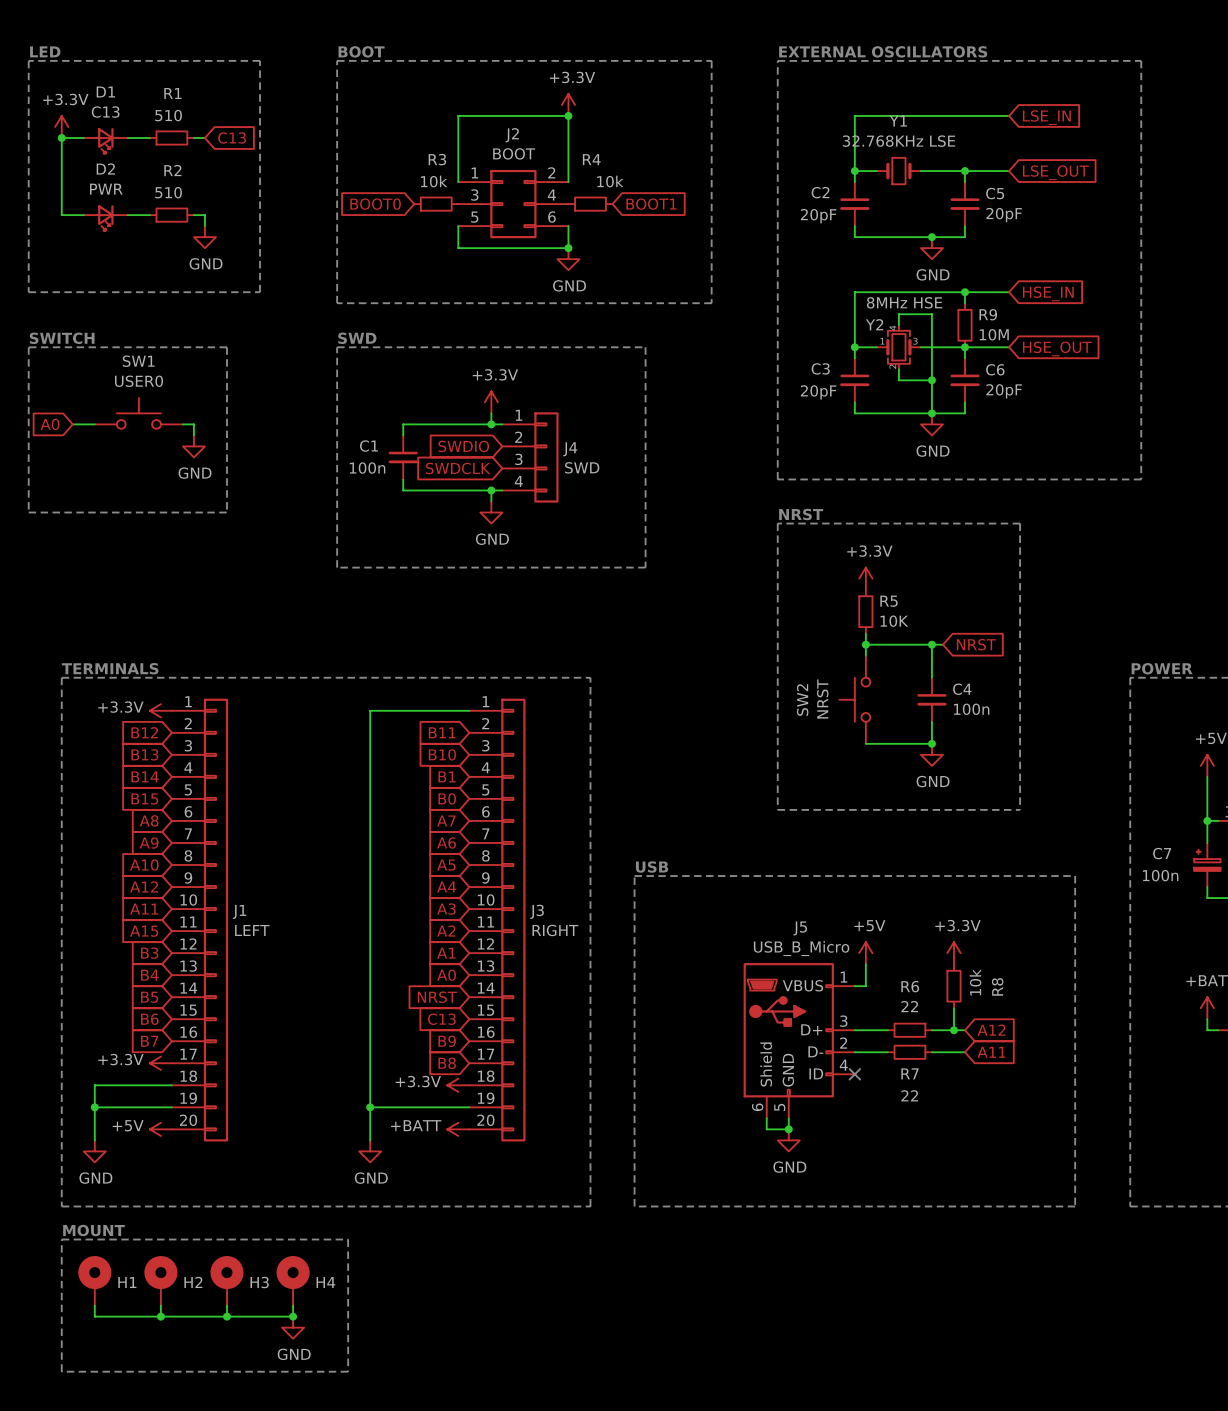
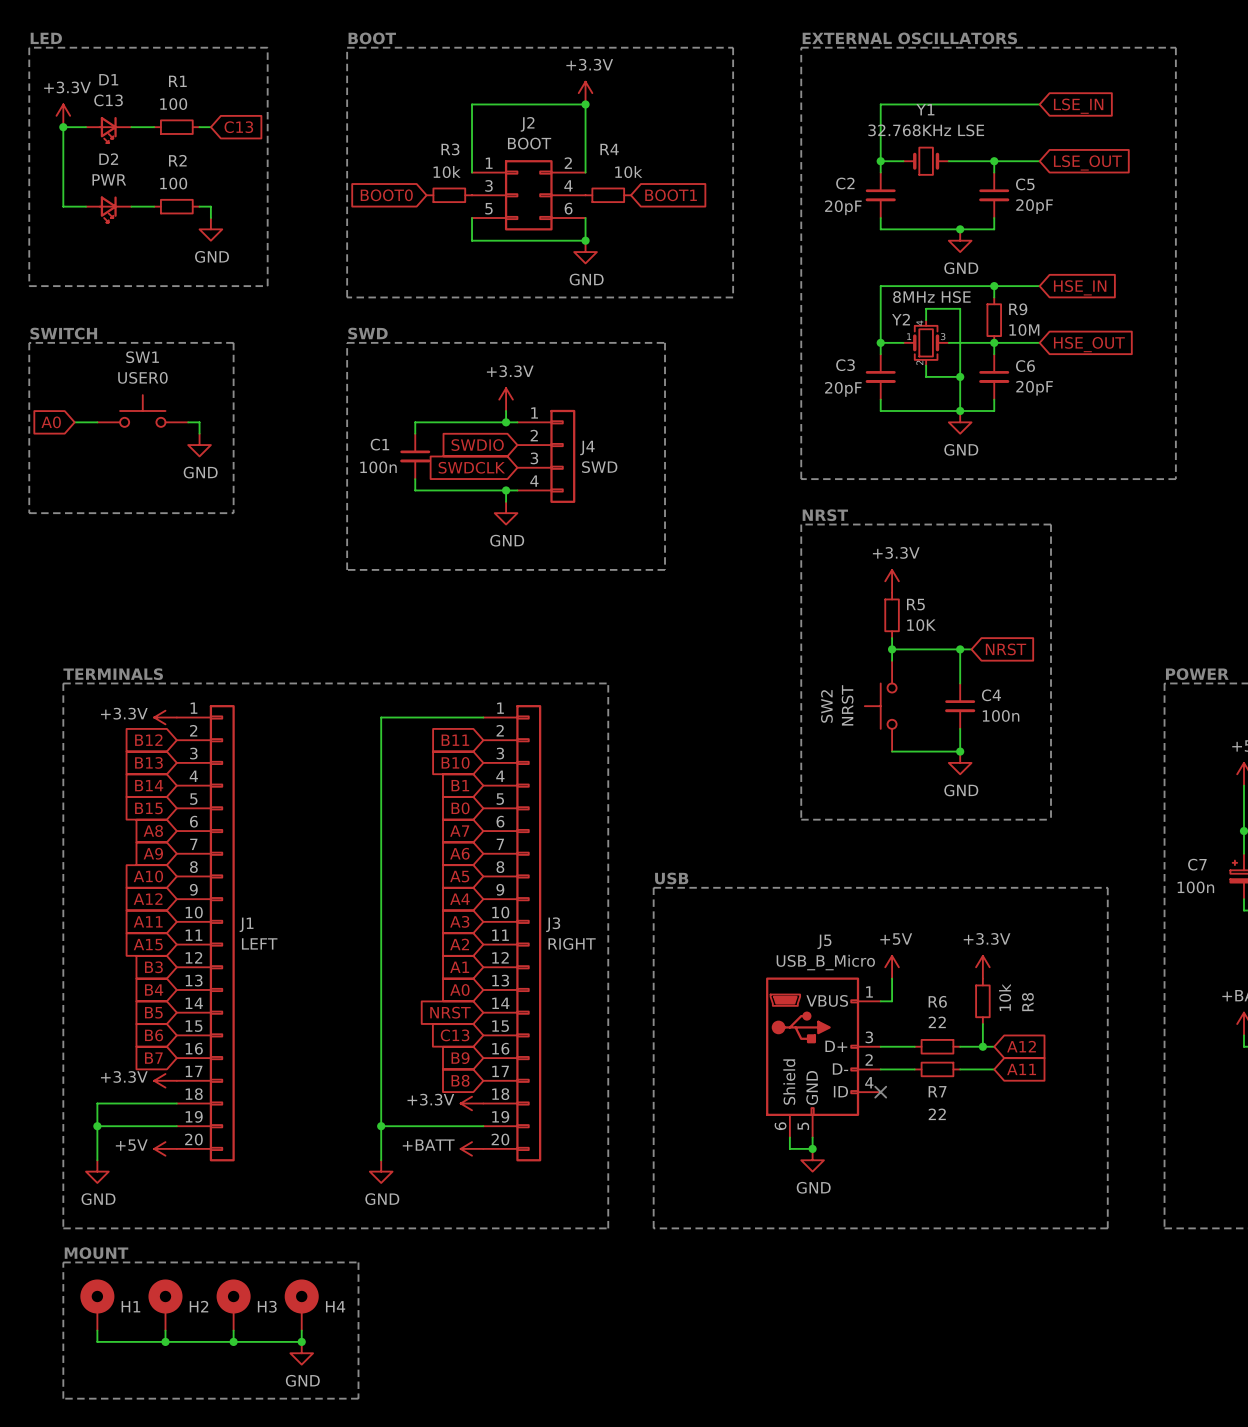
R1 value: 510 (168, 115) -> 100 (173, 104)
R2 value: 510 (168, 192) -> 100 (173, 183)

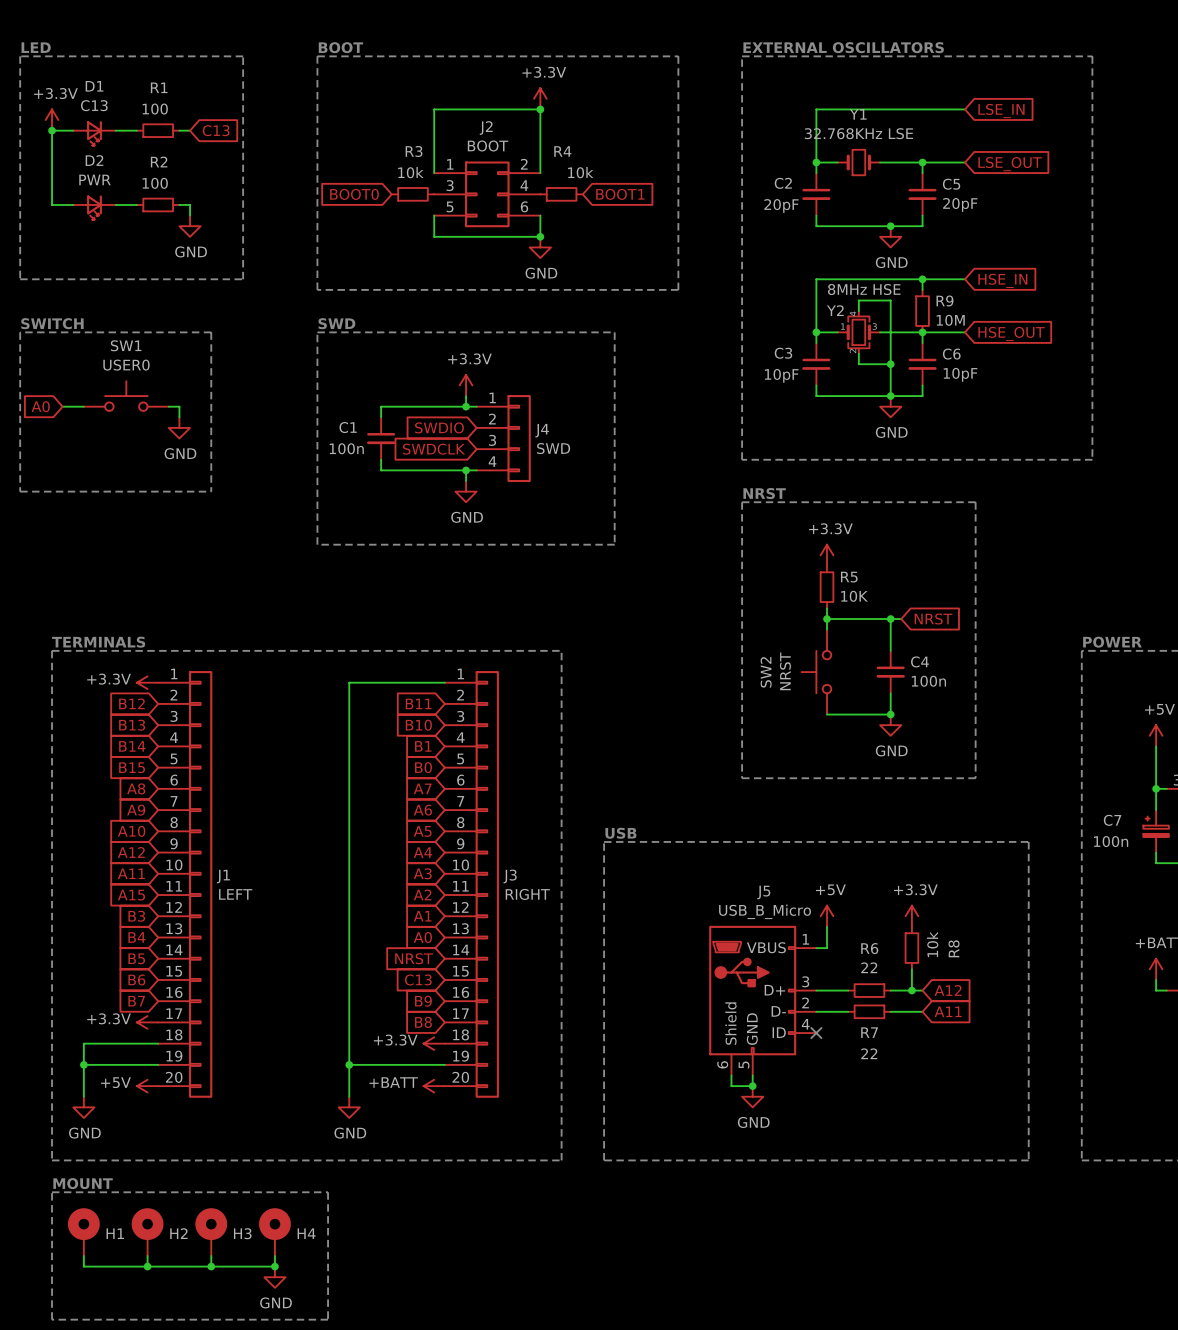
C6 value: 20pF (1034, 388) -> 10pF (960, 374)
C3 value: 20pF (843, 389) -> 10pF (781, 375)

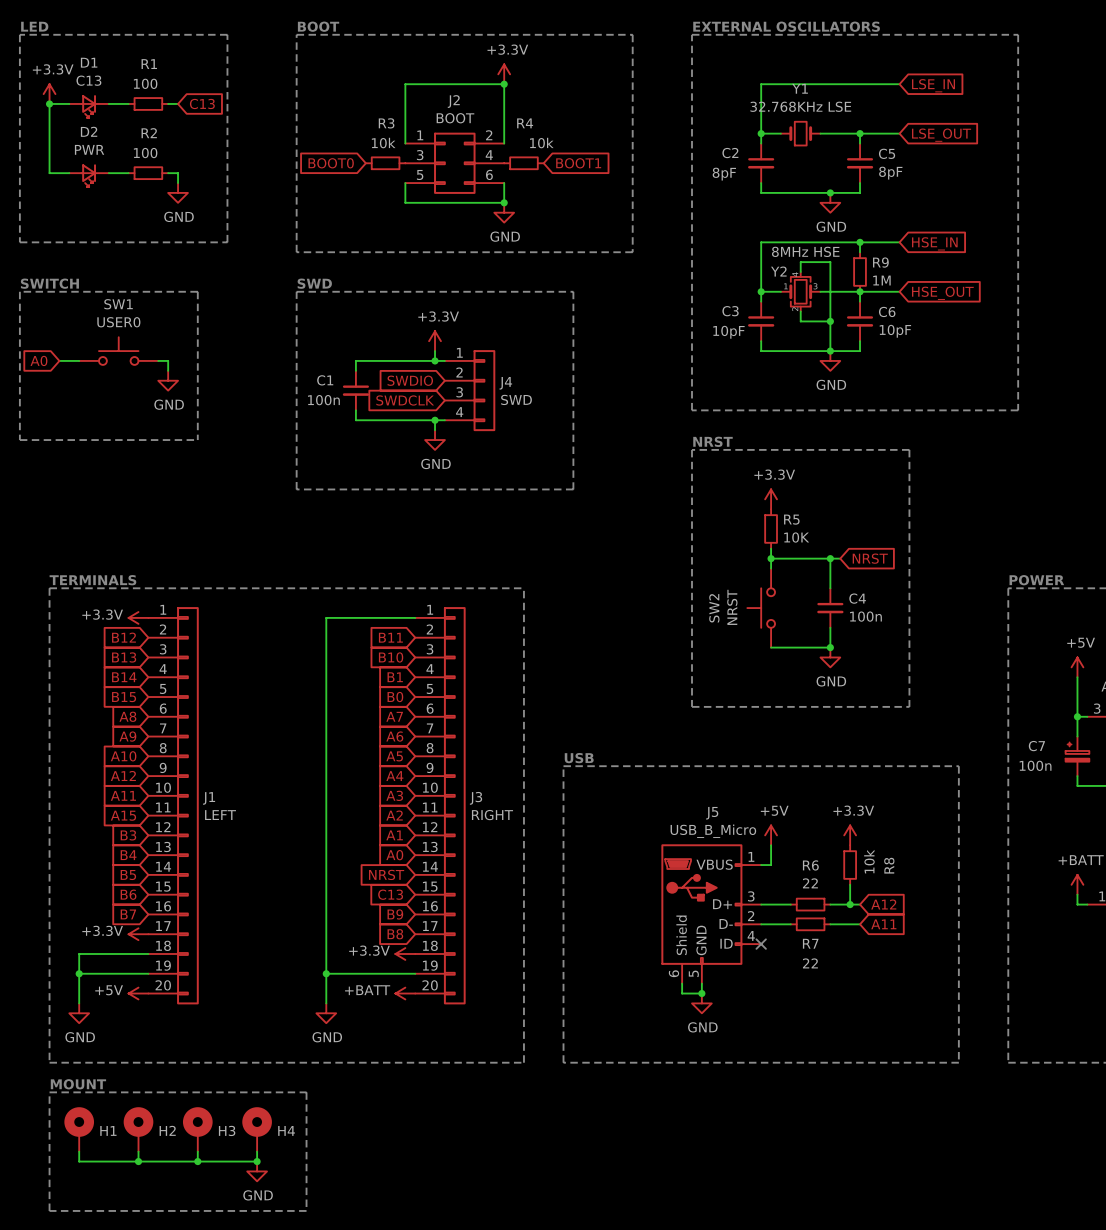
C5 value: 20pF (960, 204) -> 8pF (890, 173)
C2 value: 20pF (781, 206) -> 8pF (724, 174)
R9 value: 10M (950, 320) -> 1M (881, 280)

